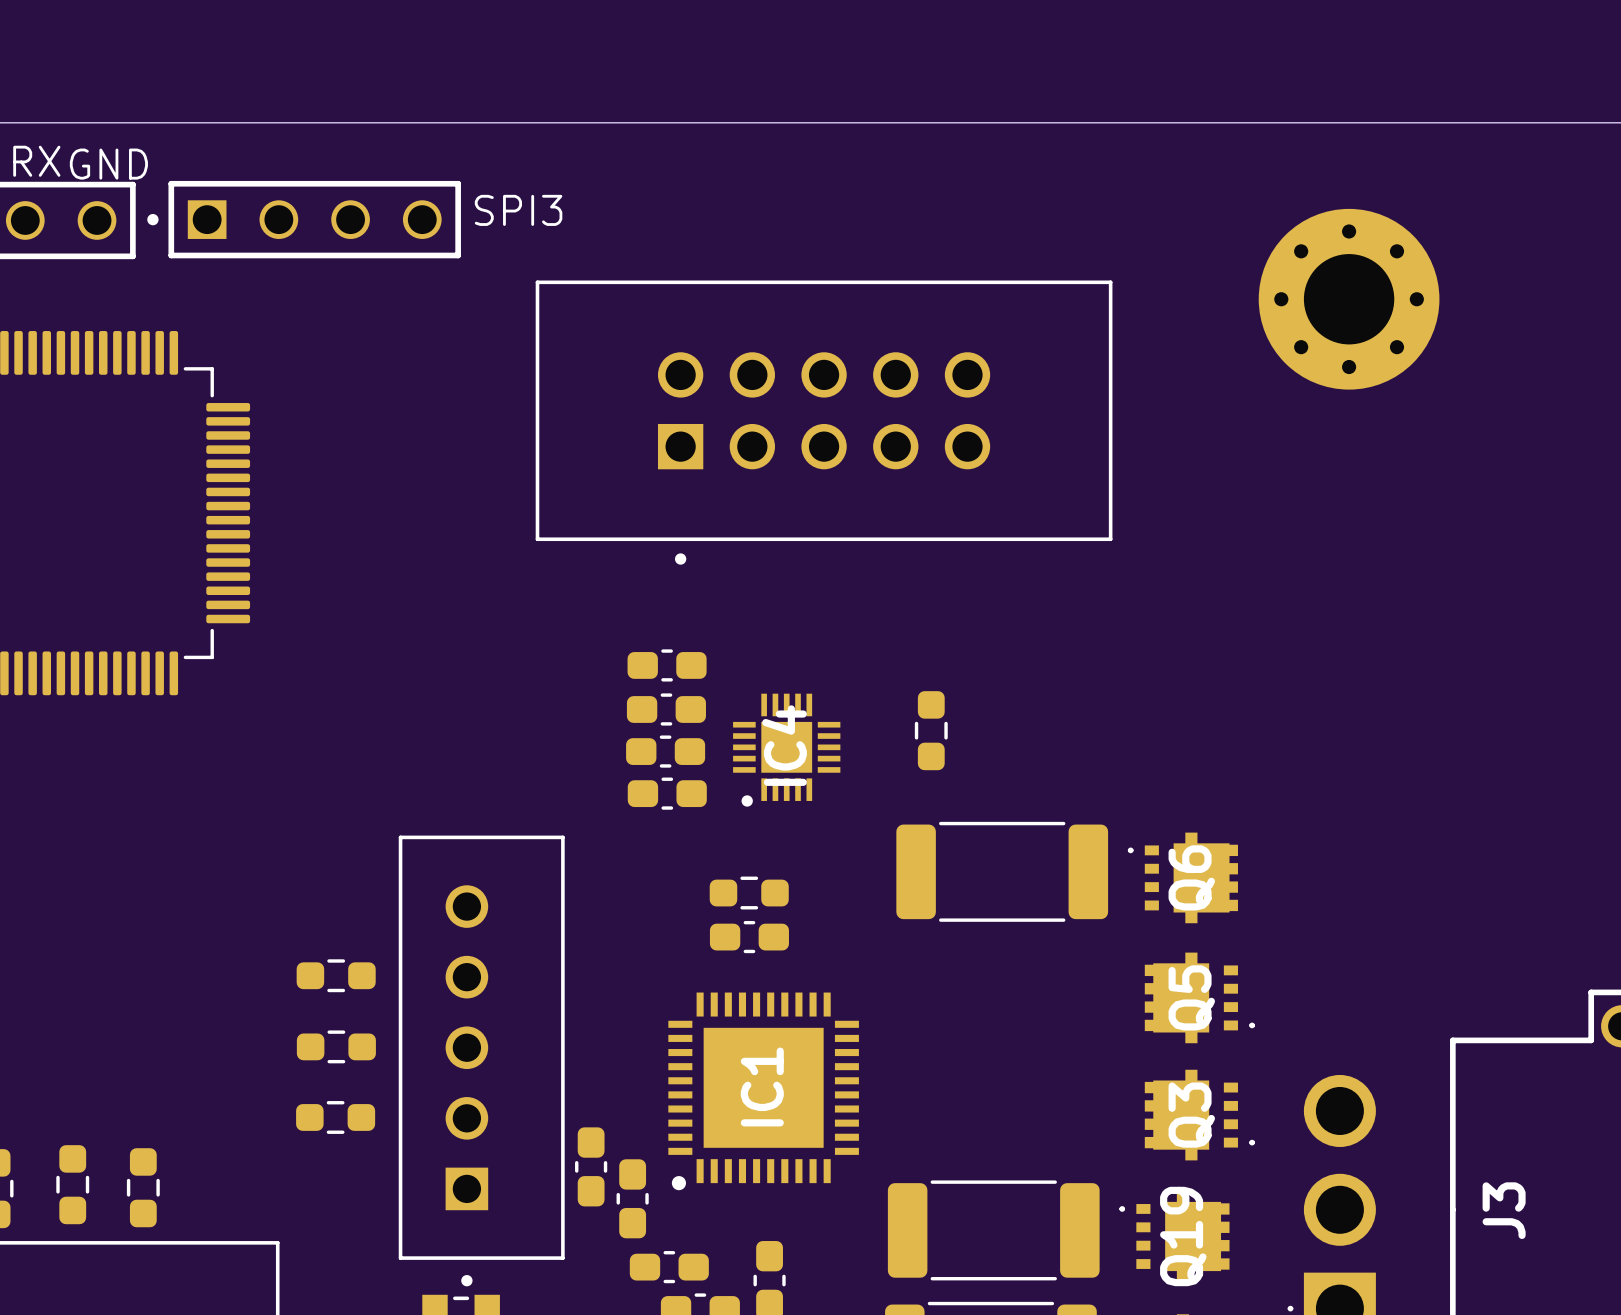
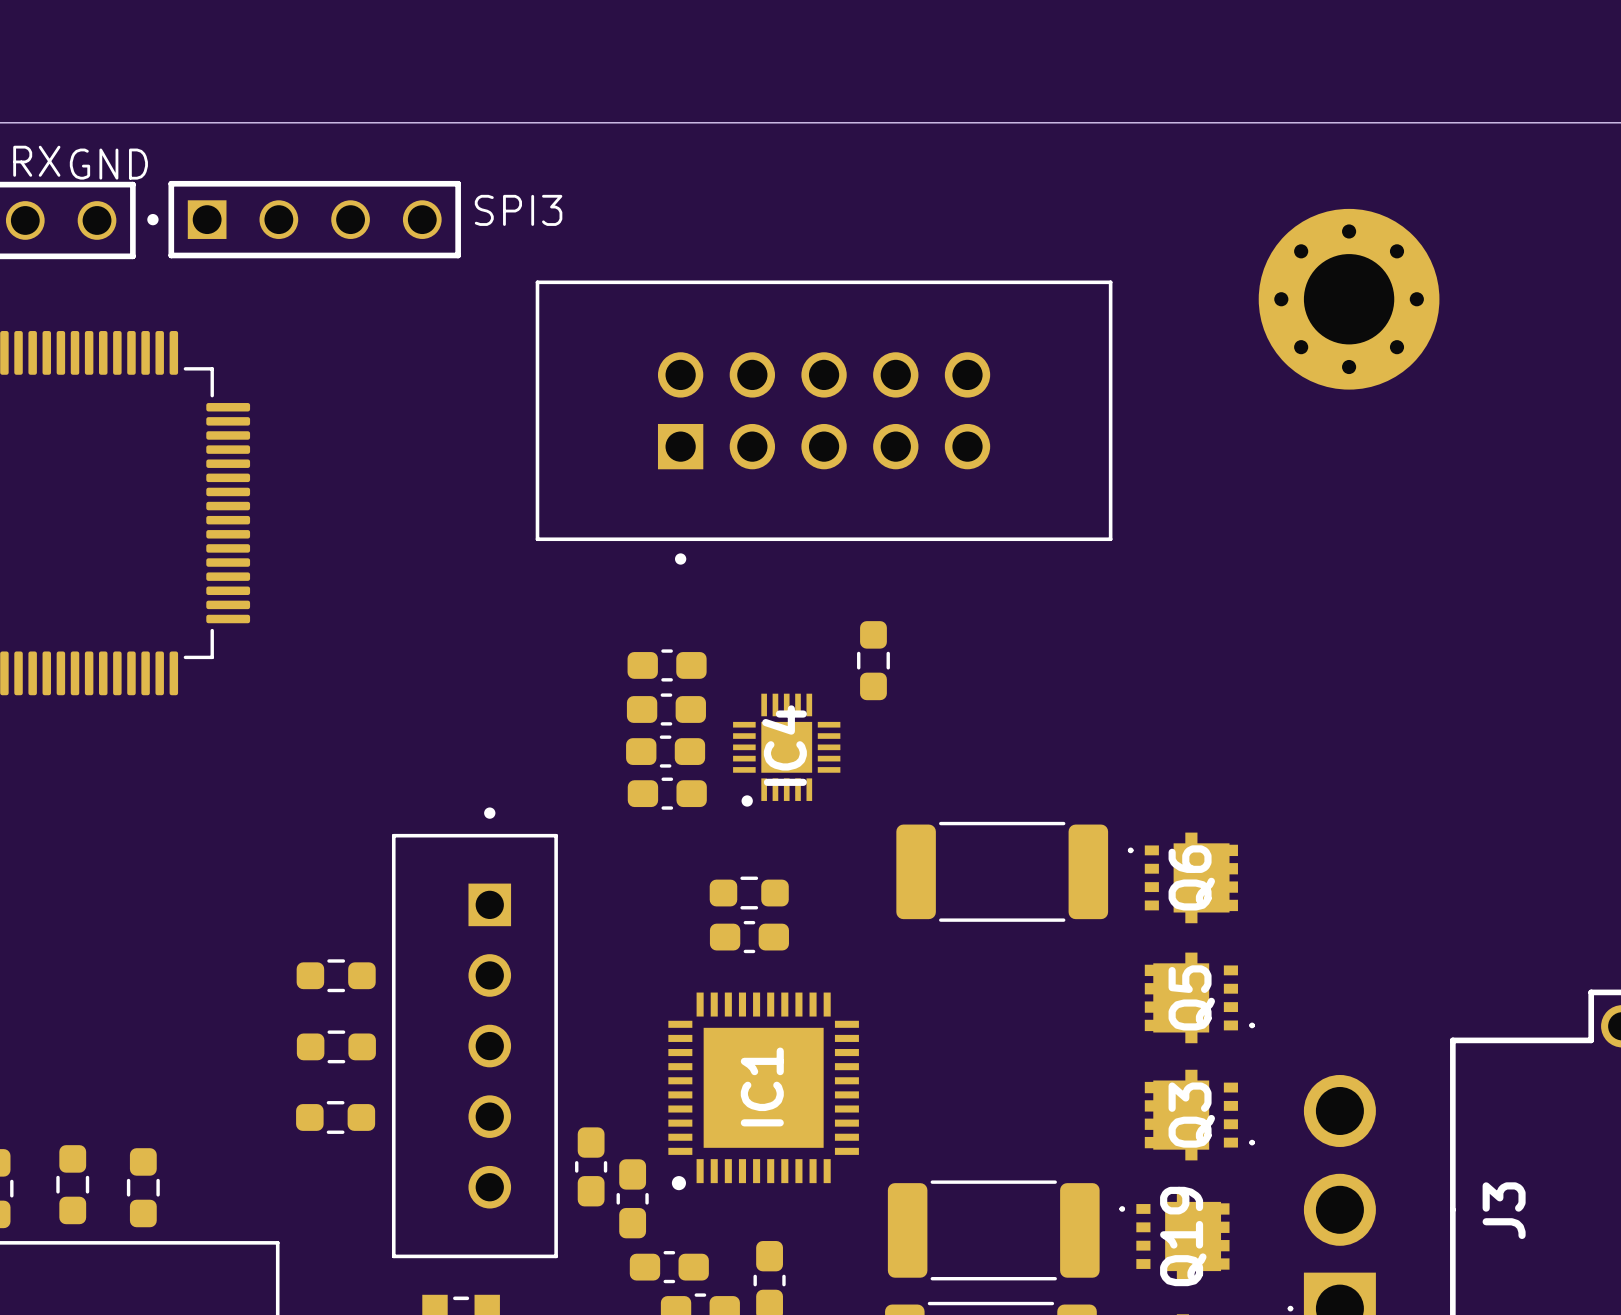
part position: (931, 730) -> (873, 660)
part rotation: 0° (481, 1060) -> 180° (474, 1032)

